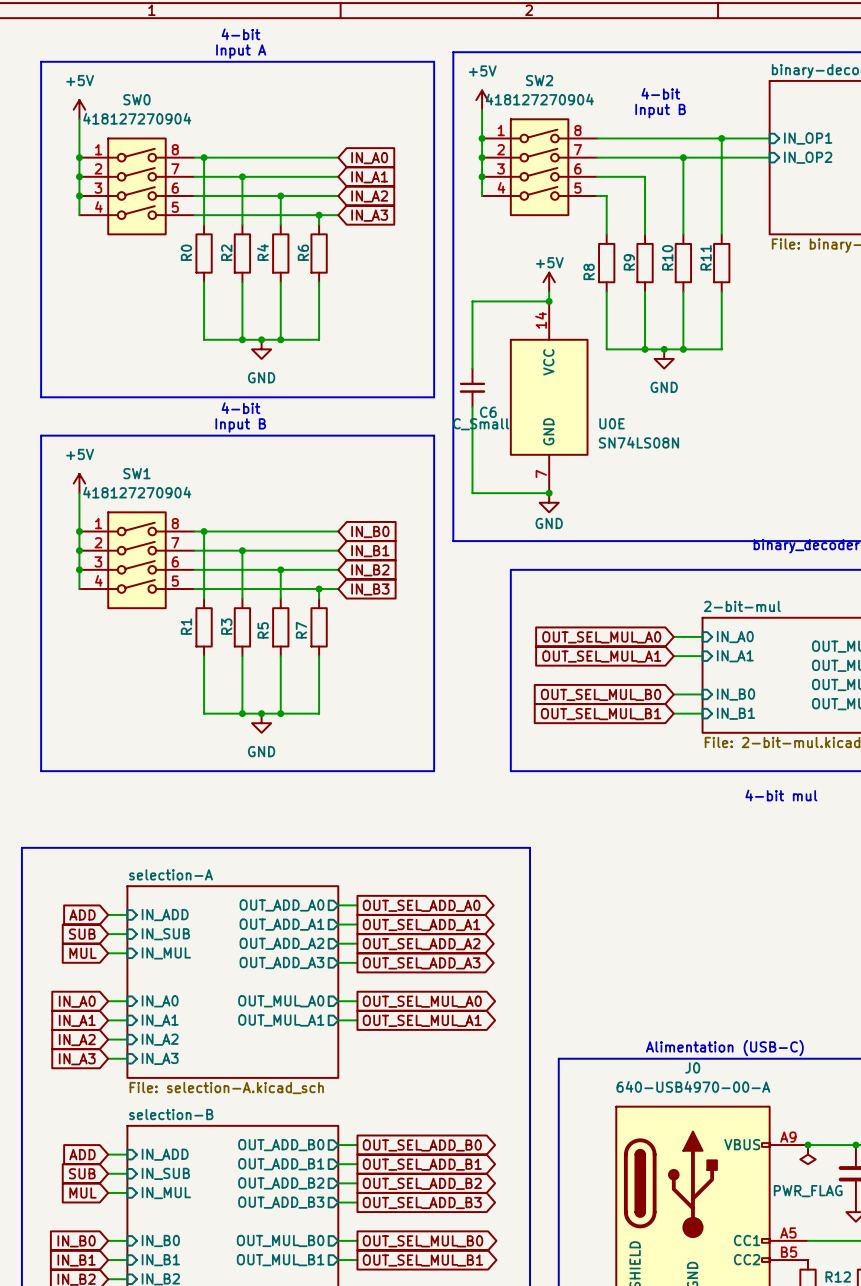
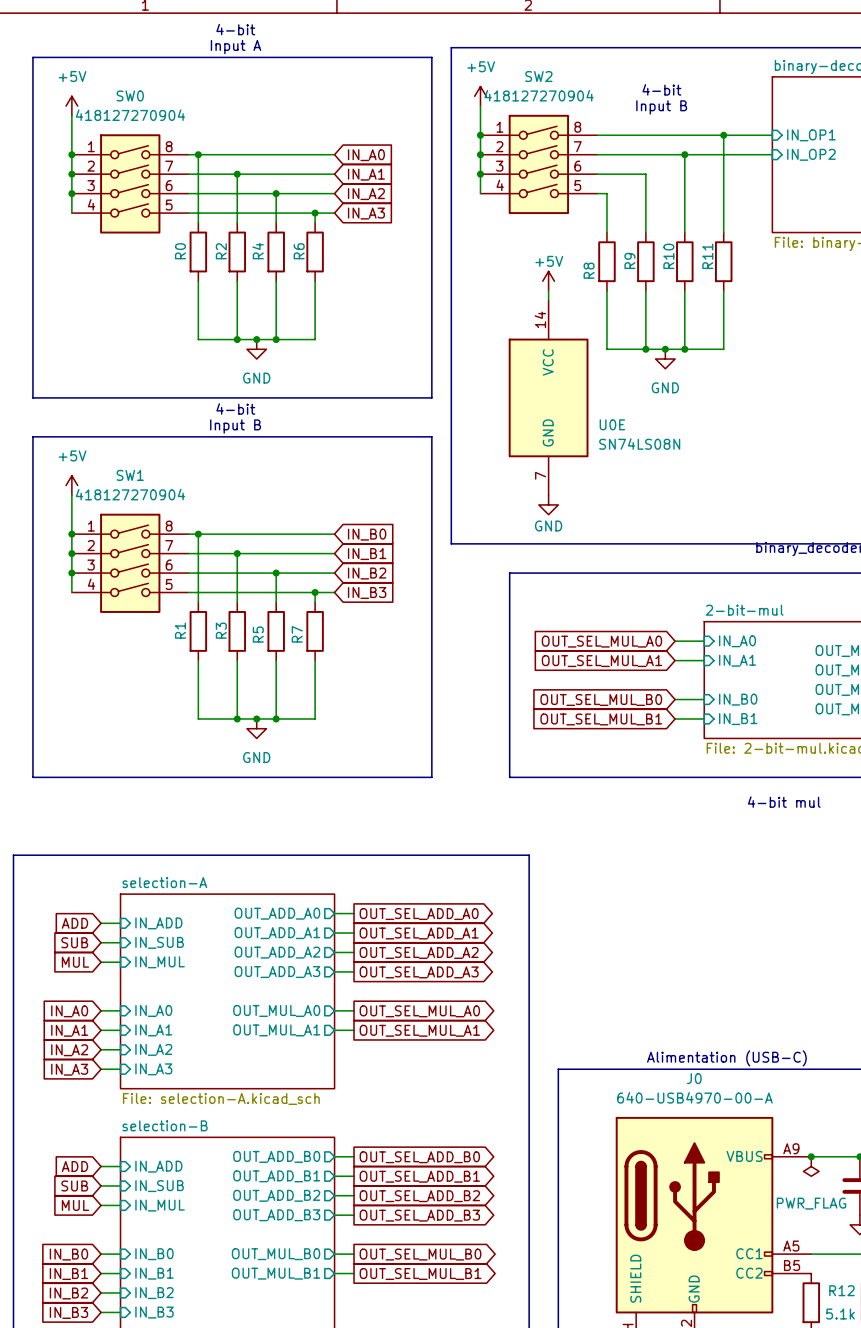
wire: (549, 301) (472, 301) (472, 368) -> none
junction: (549, 301) -> none
C6: C_Small (472, 387) -> none
wire: (472, 406) (472, 493) (549, 493) -> none
junction: (549, 493) -> none

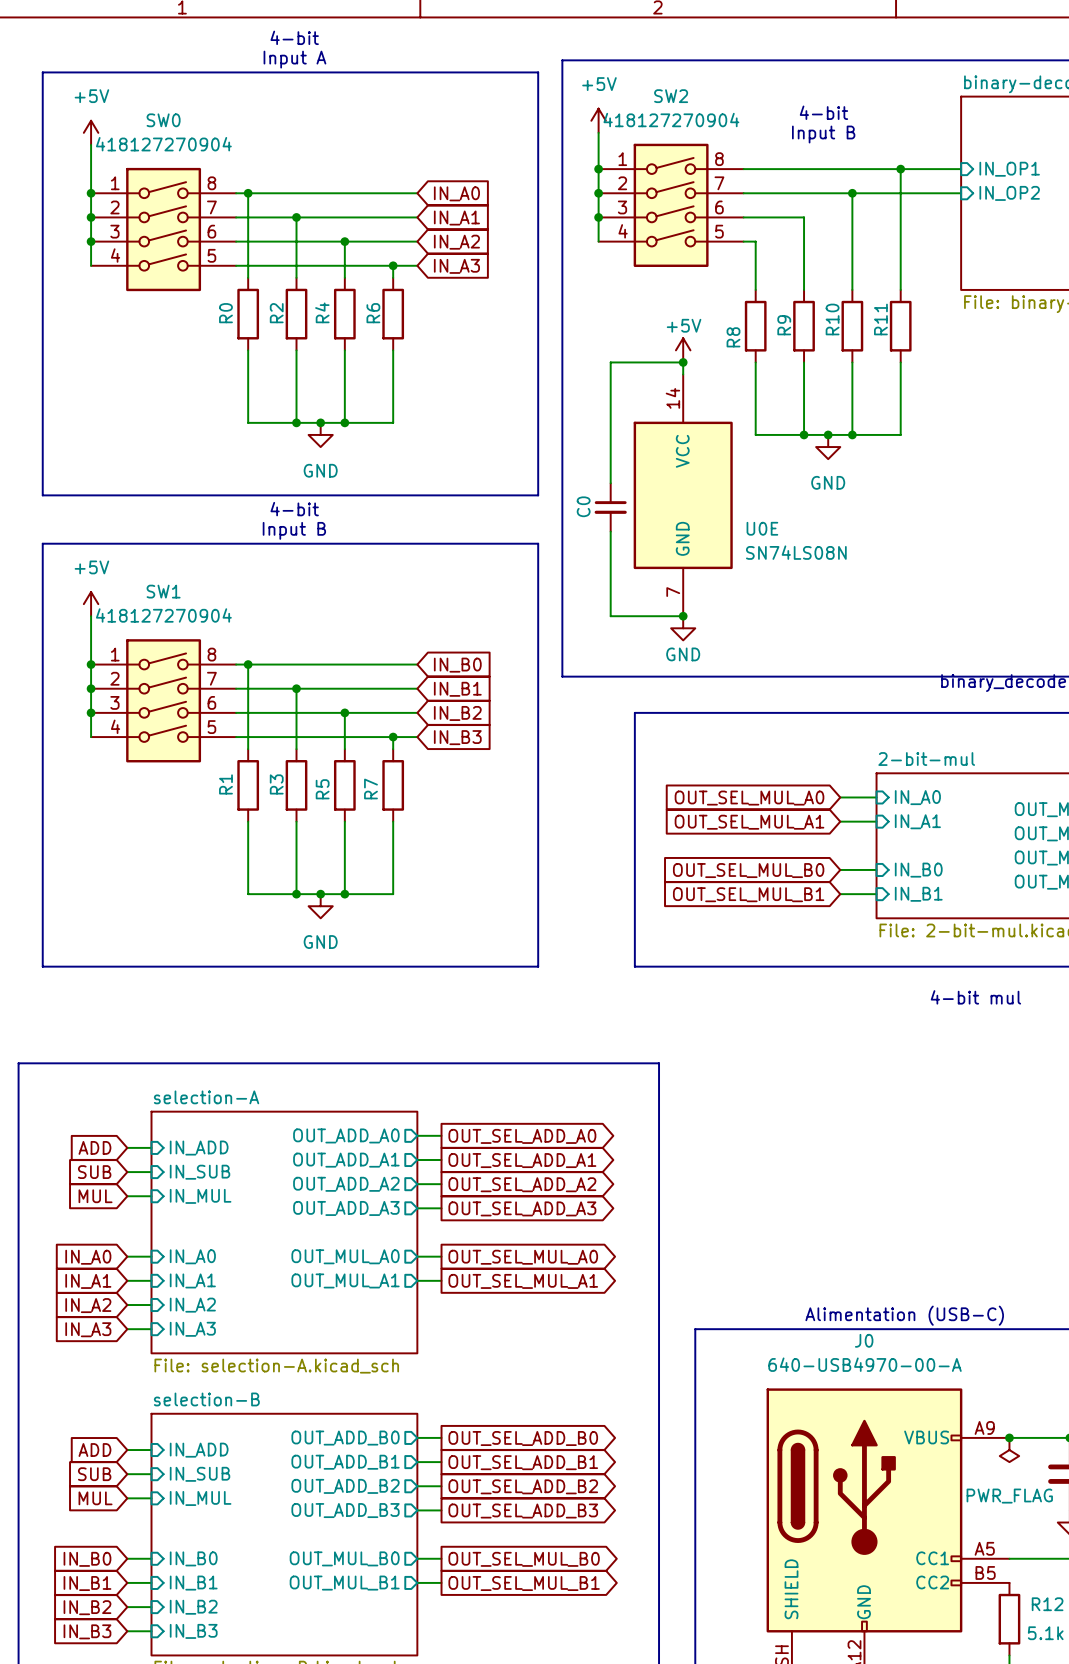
wire: none -> (683, 362) (610, 362) (610, 483)
junction: none -> (683, 362)
C0: none -> (610, 507)
wire: none -> (610, 531) (610, 616) (683, 616)
junction: none -> (683, 616)

